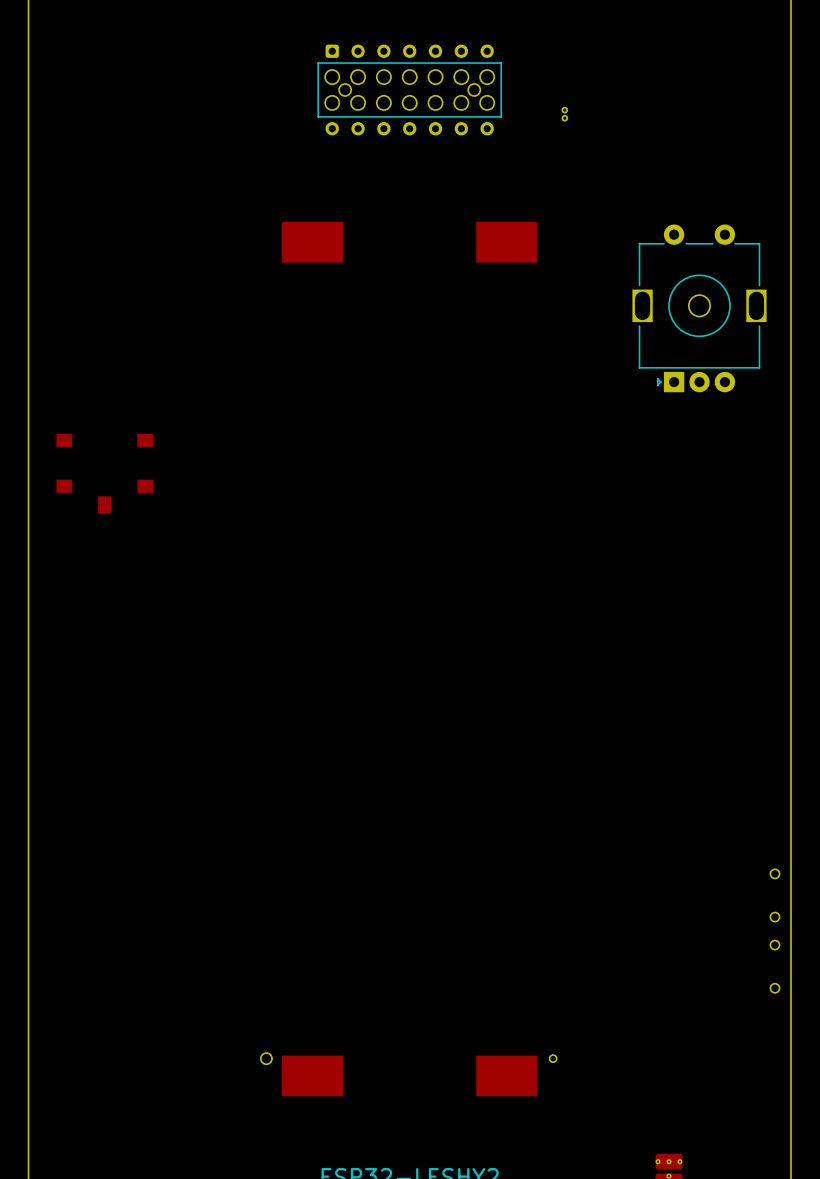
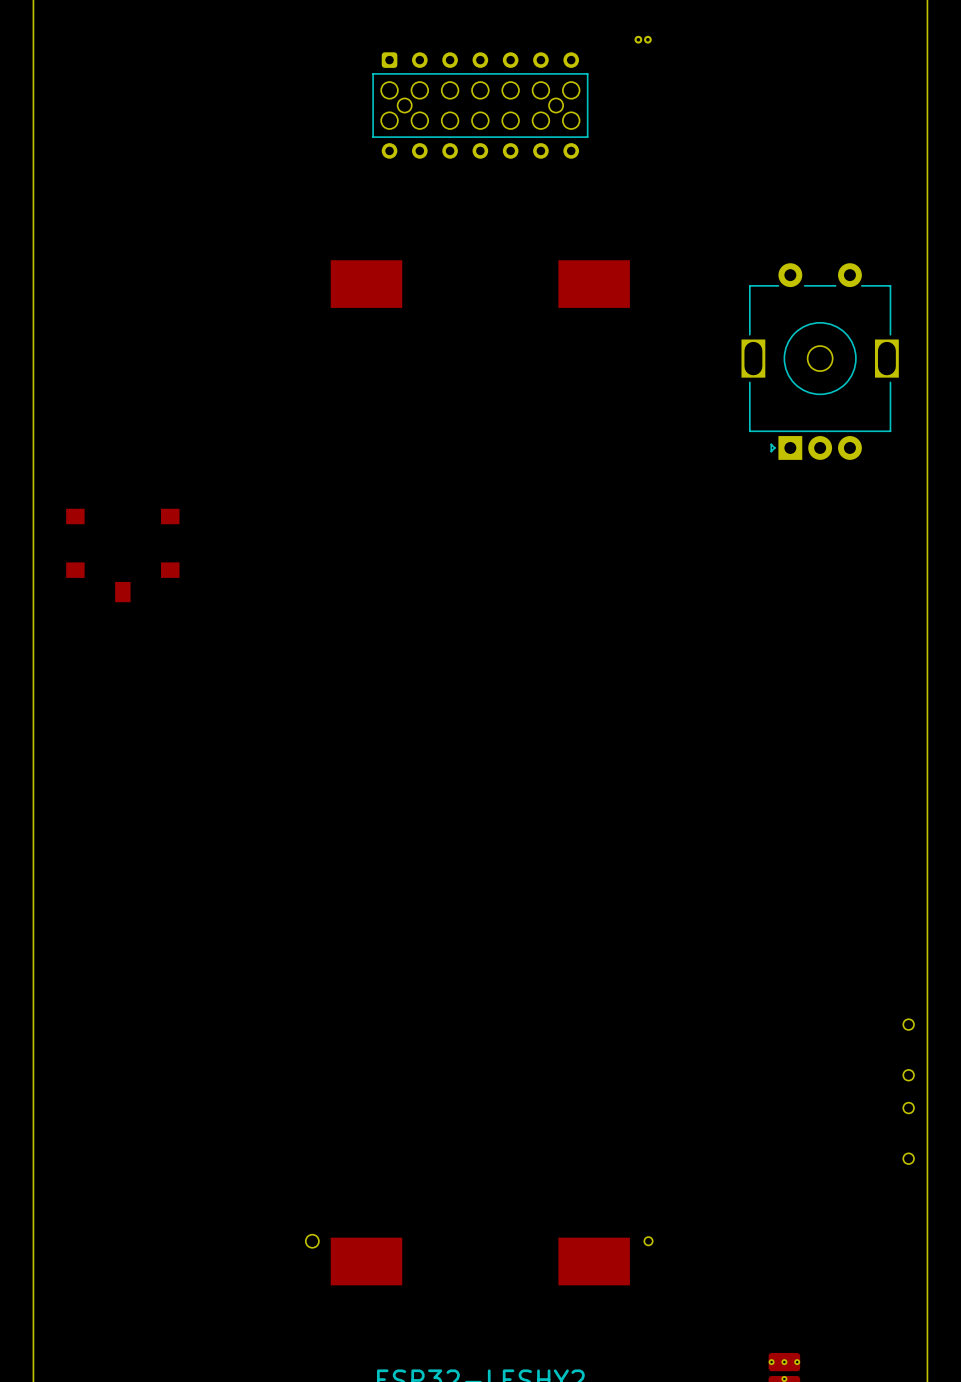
part rotation: 0° (564, 114) -> 90° clockwise (643, 39)
part position: (564, 114) -> (643, 39)

